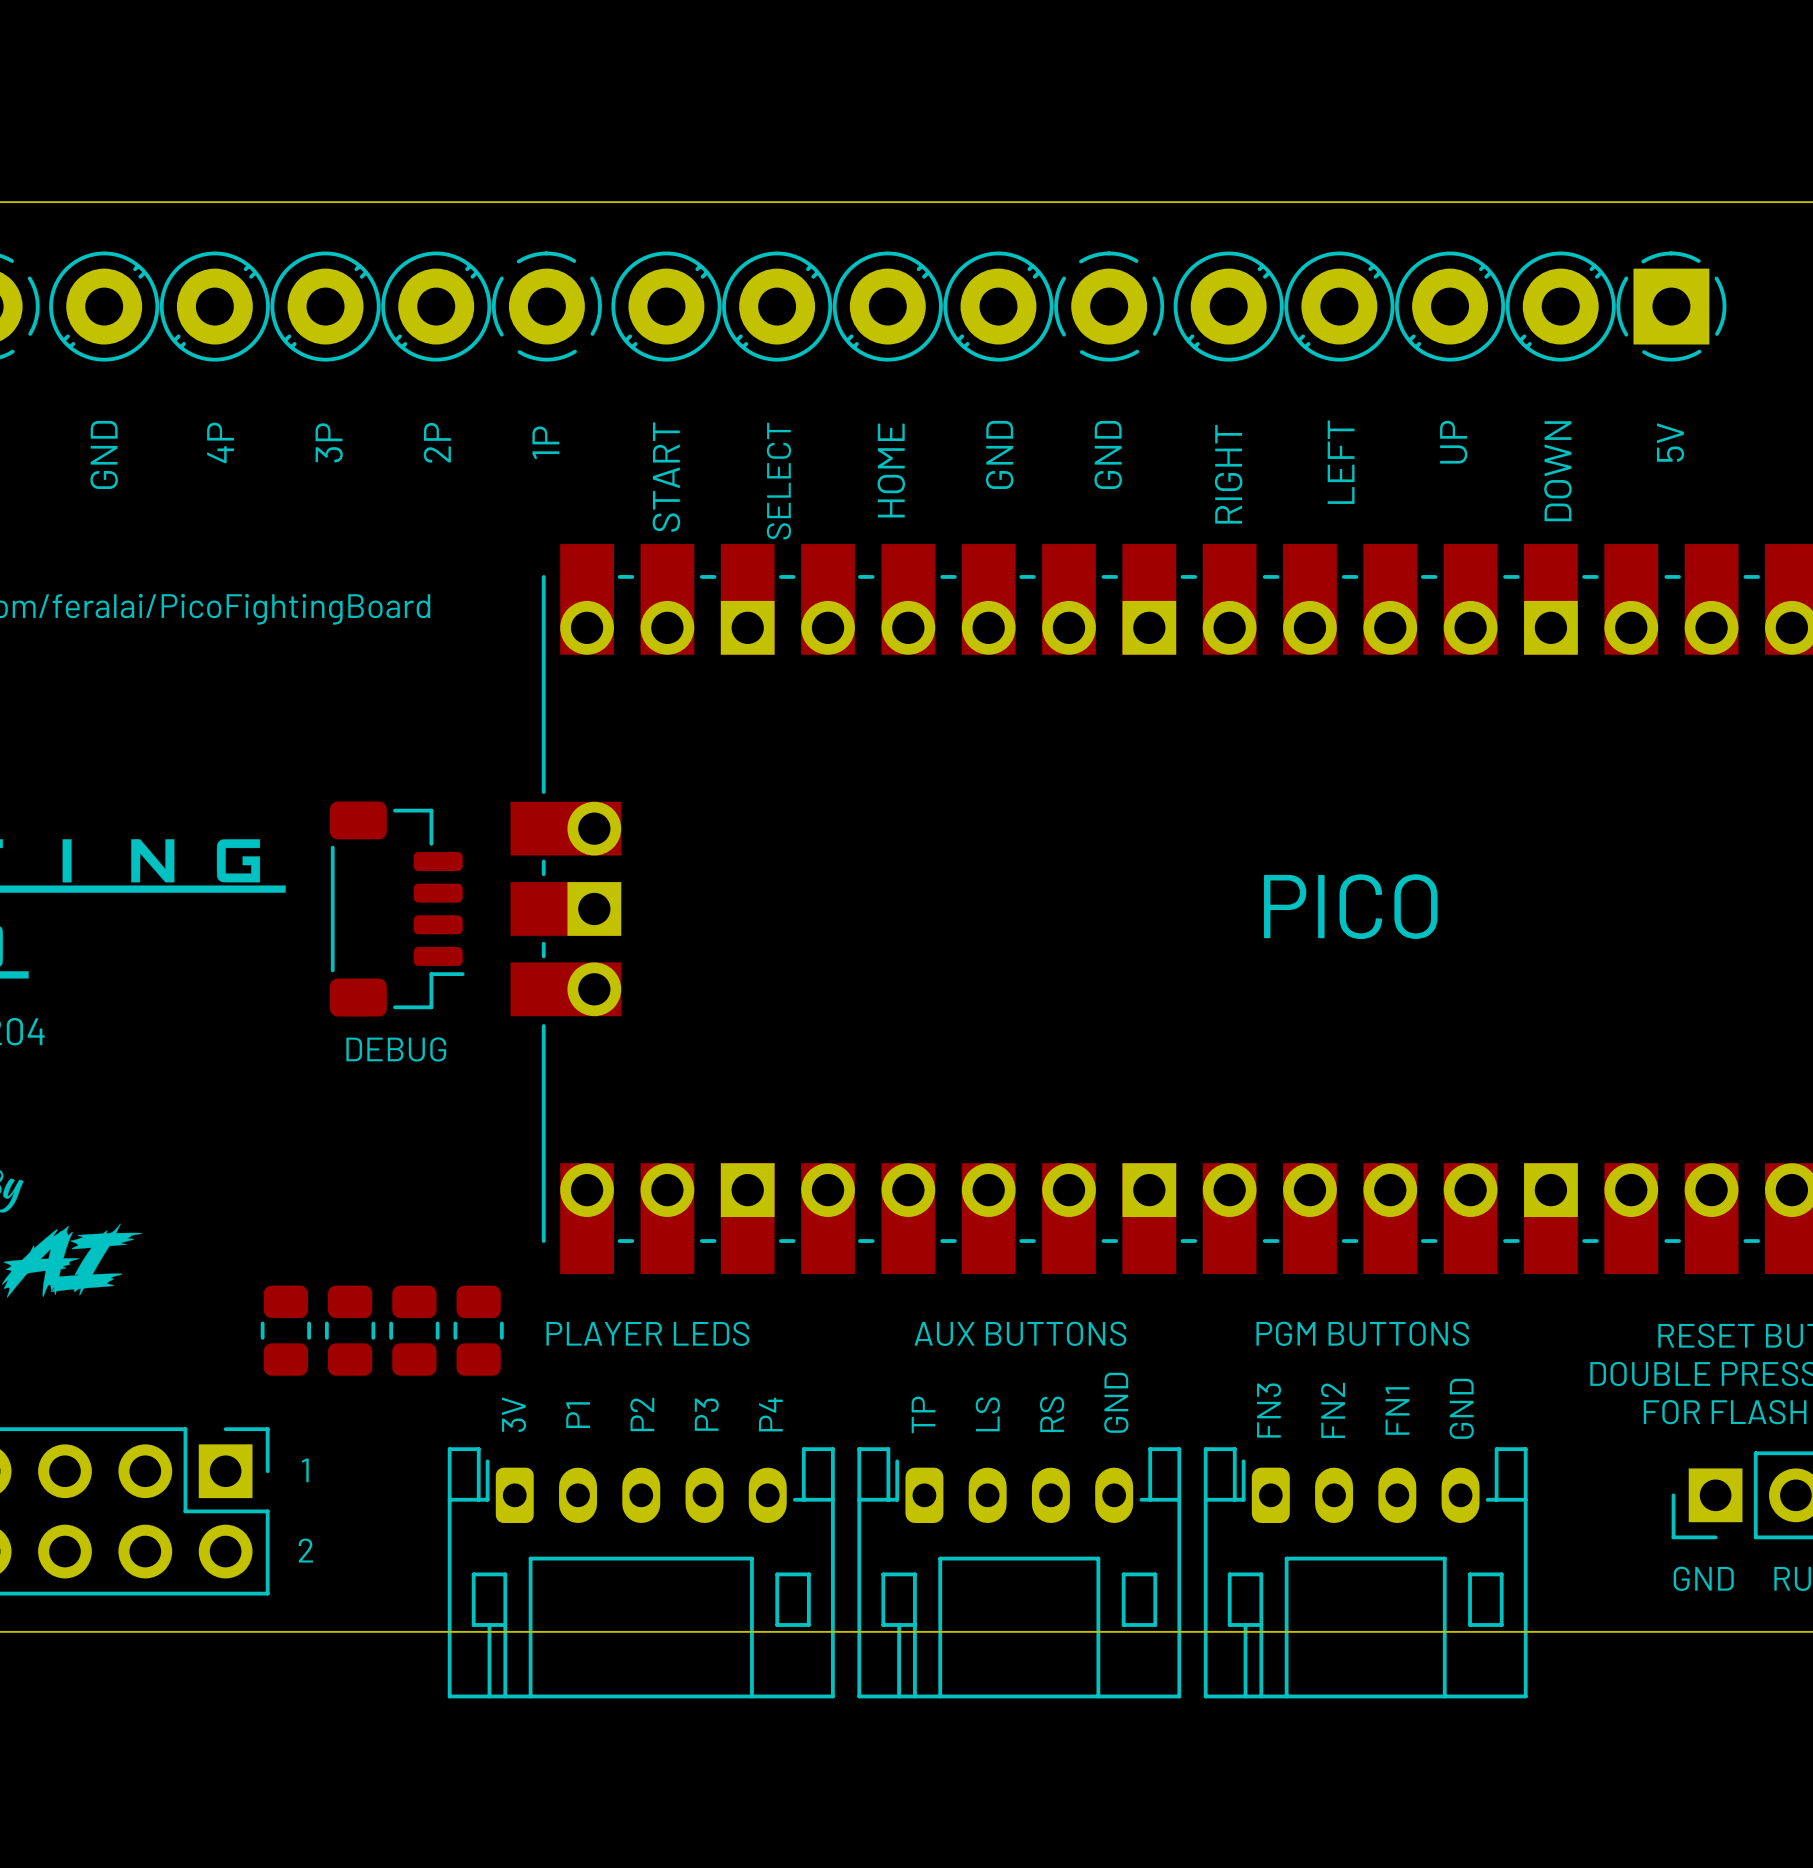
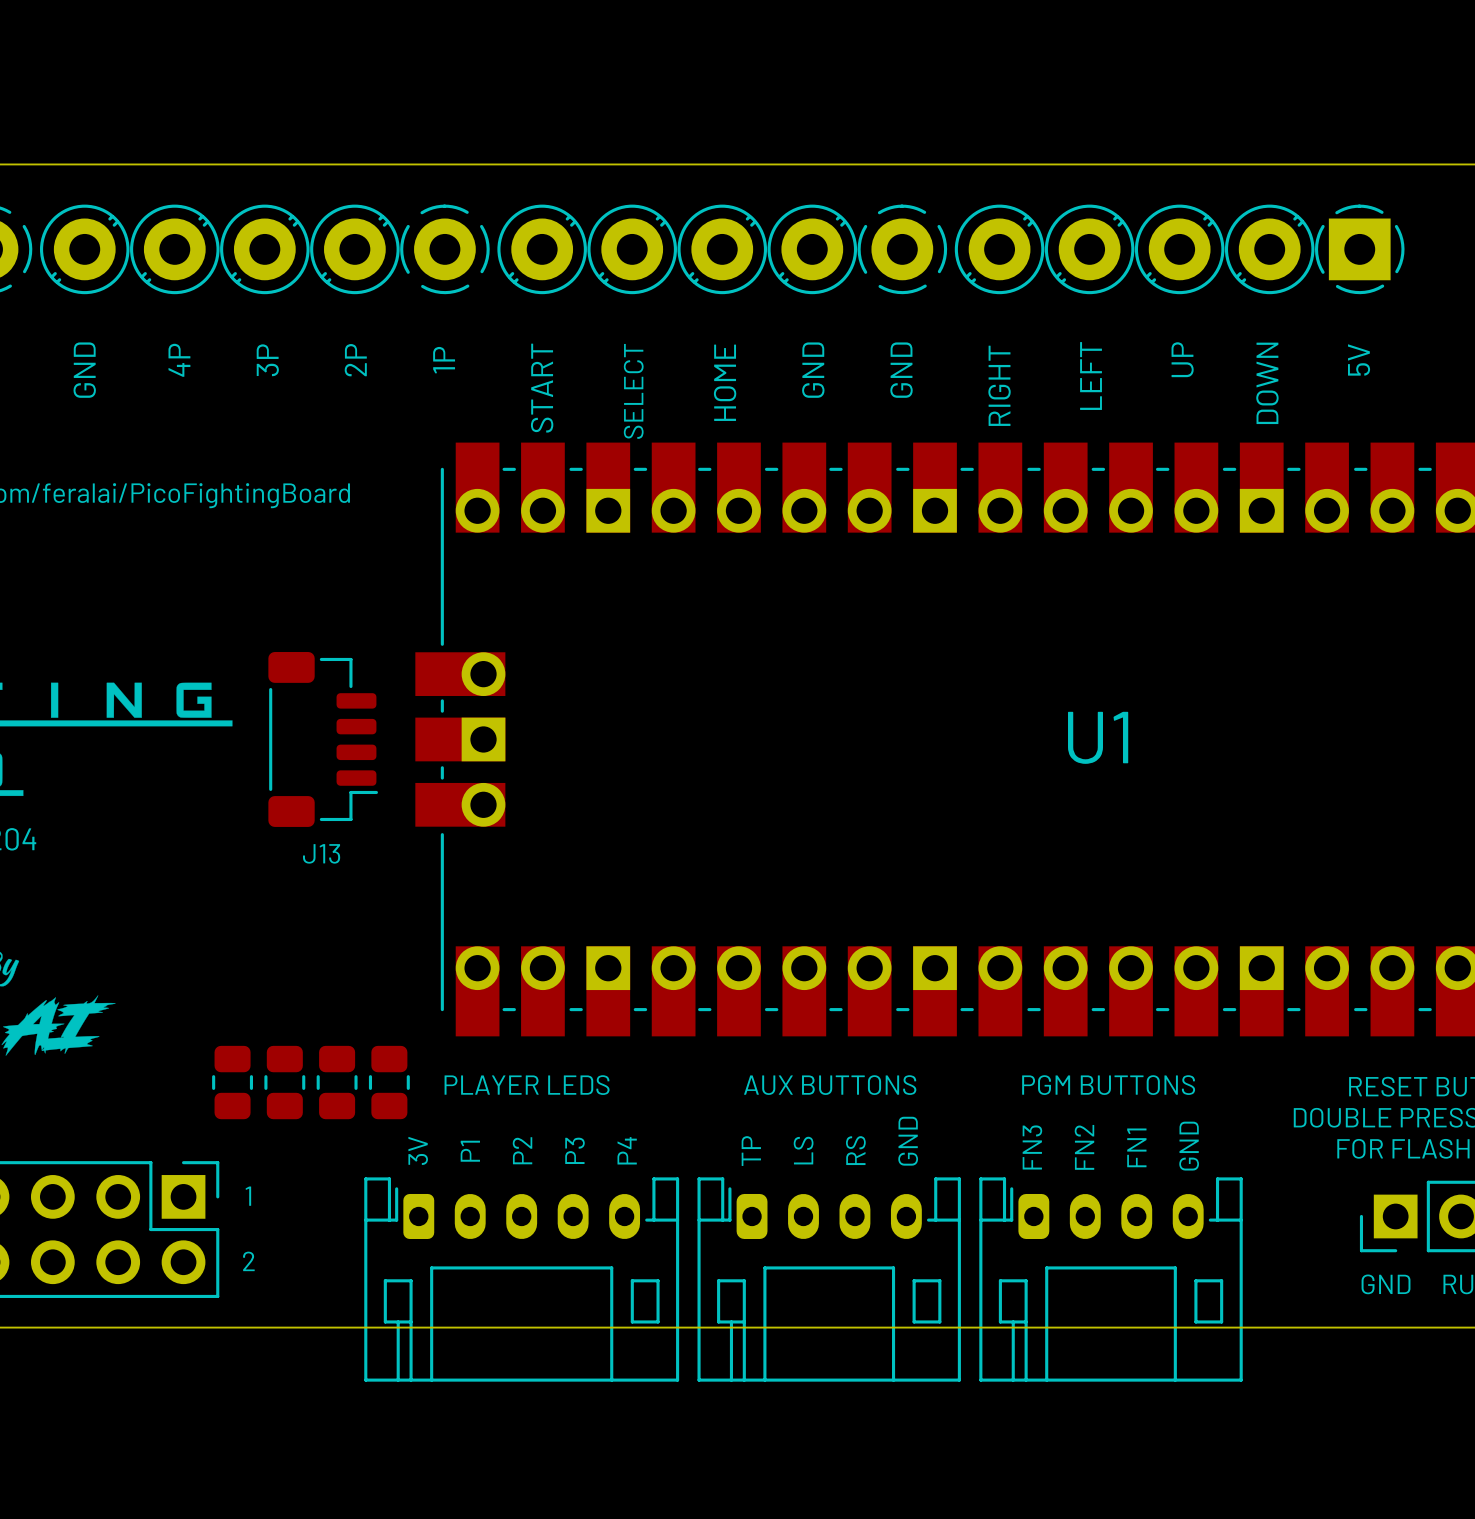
PICO name: PICO (1350, 906) -> U1 (1098, 737)
DEBUG name: DEBUG (396, 1049) -> J13 (321, 853)

